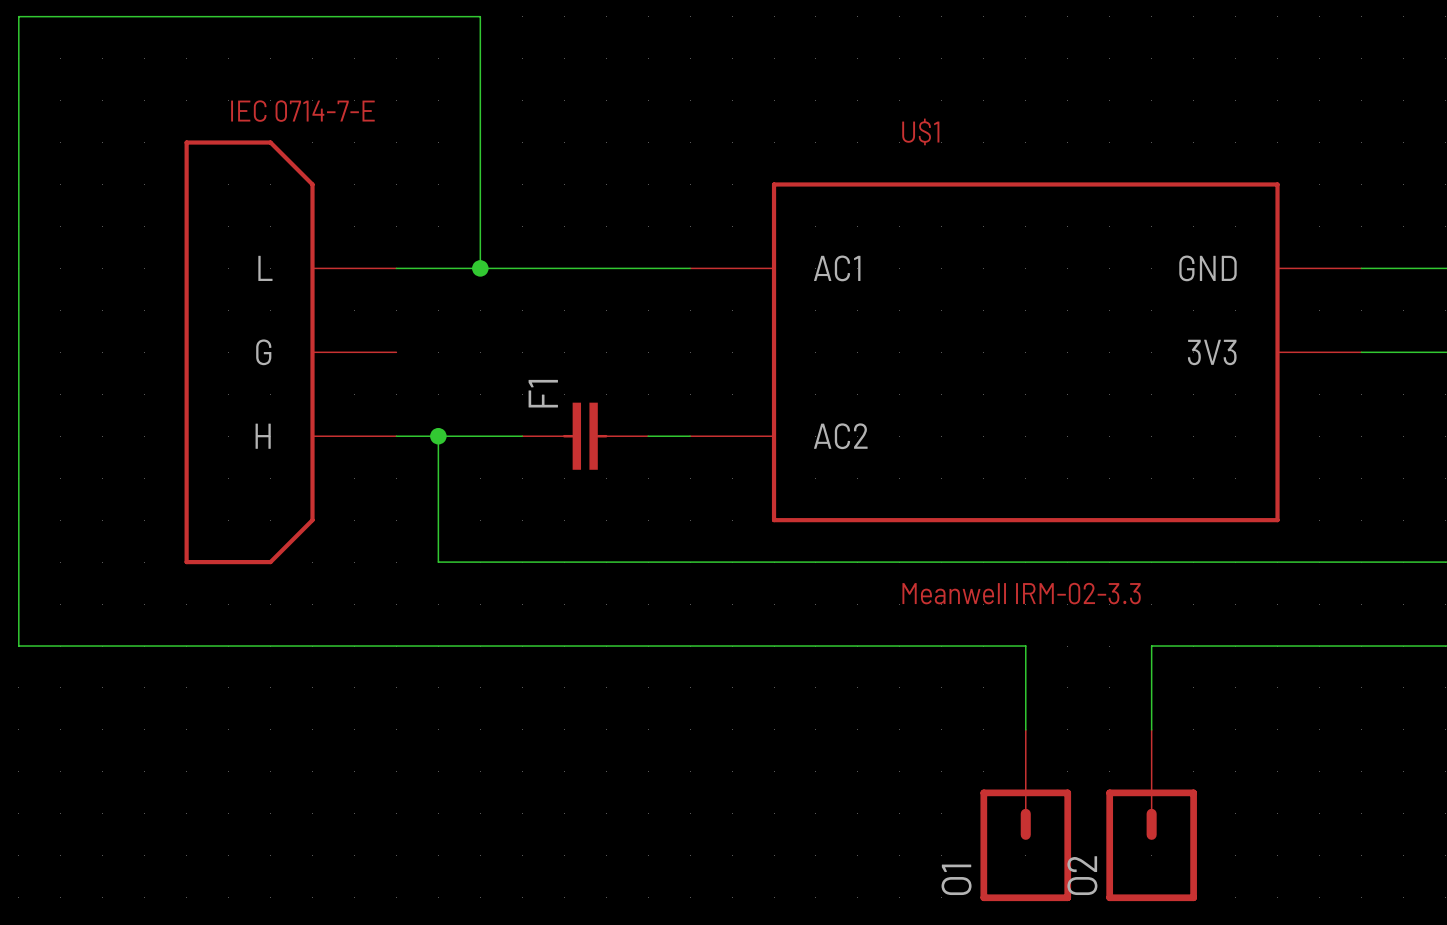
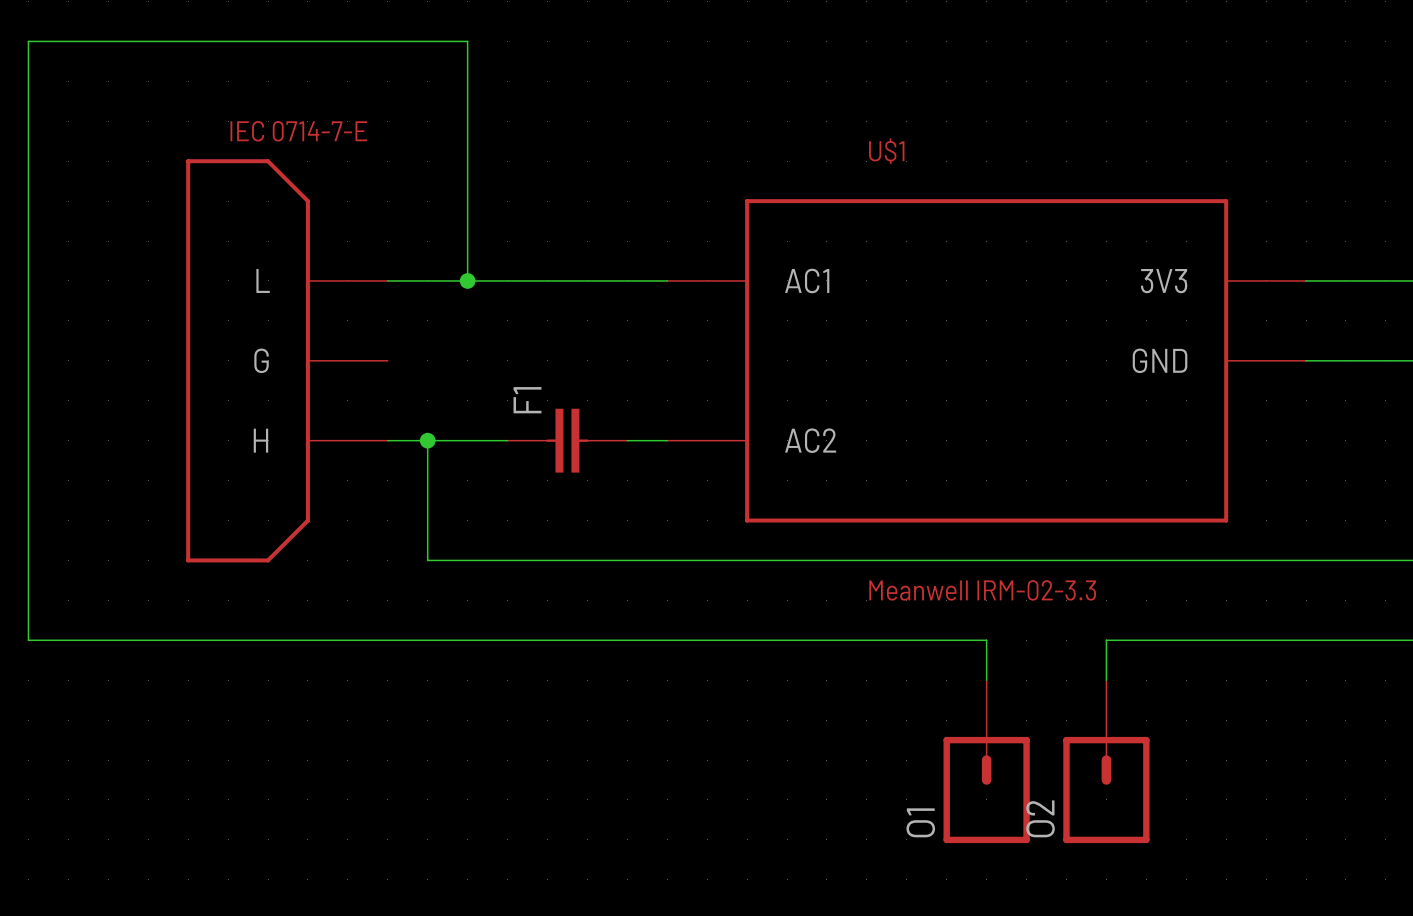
U$1 pin name: GND (1207, 268) -> 3V3 (1164, 281)
U$1 pin name: 3V3 (1212, 352) -> GND (1160, 360)
O1 position: (1025, 815) -> (986, 761)
O2 position: (1151, 815) -> (1106, 761)

